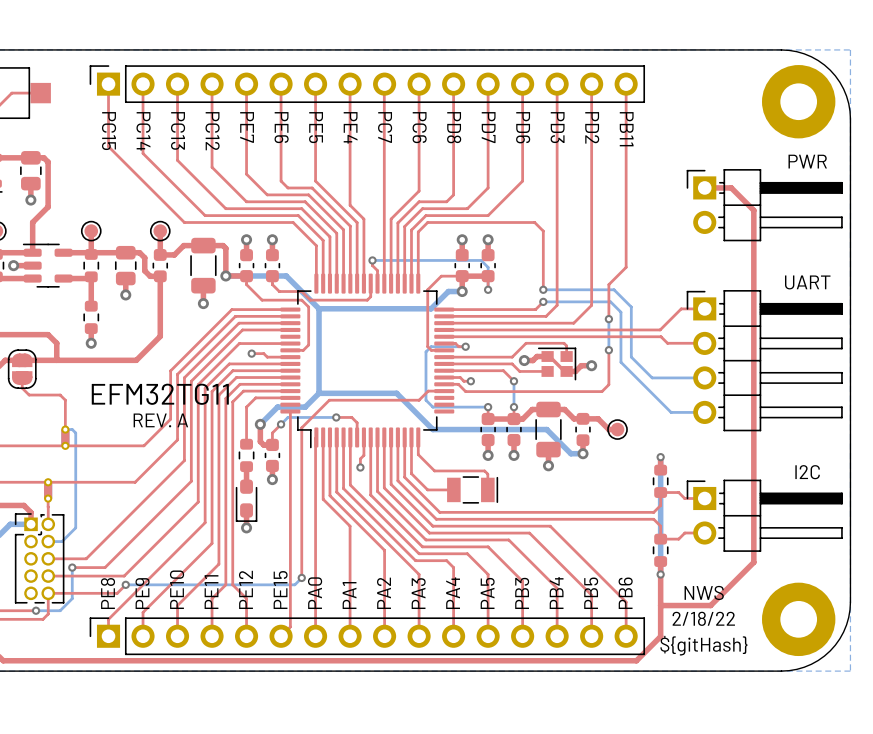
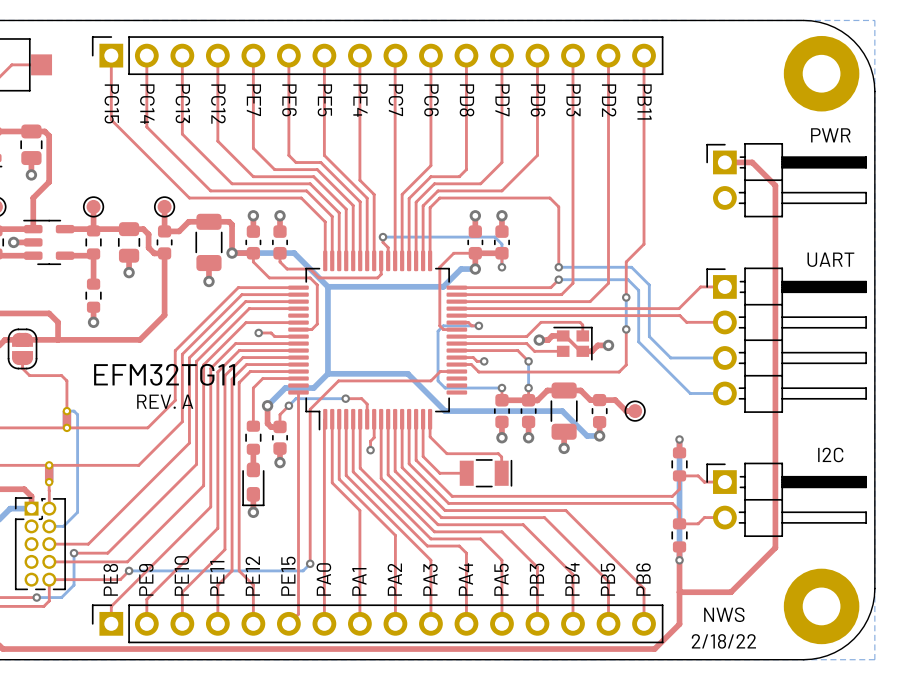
text position: NWS (704, 592) -> NWS (724, 614)
text position: 2/18/22 (703, 618) -> 2/18/22 (723, 641)
text: ${gitHash} (703, 645) -> none

